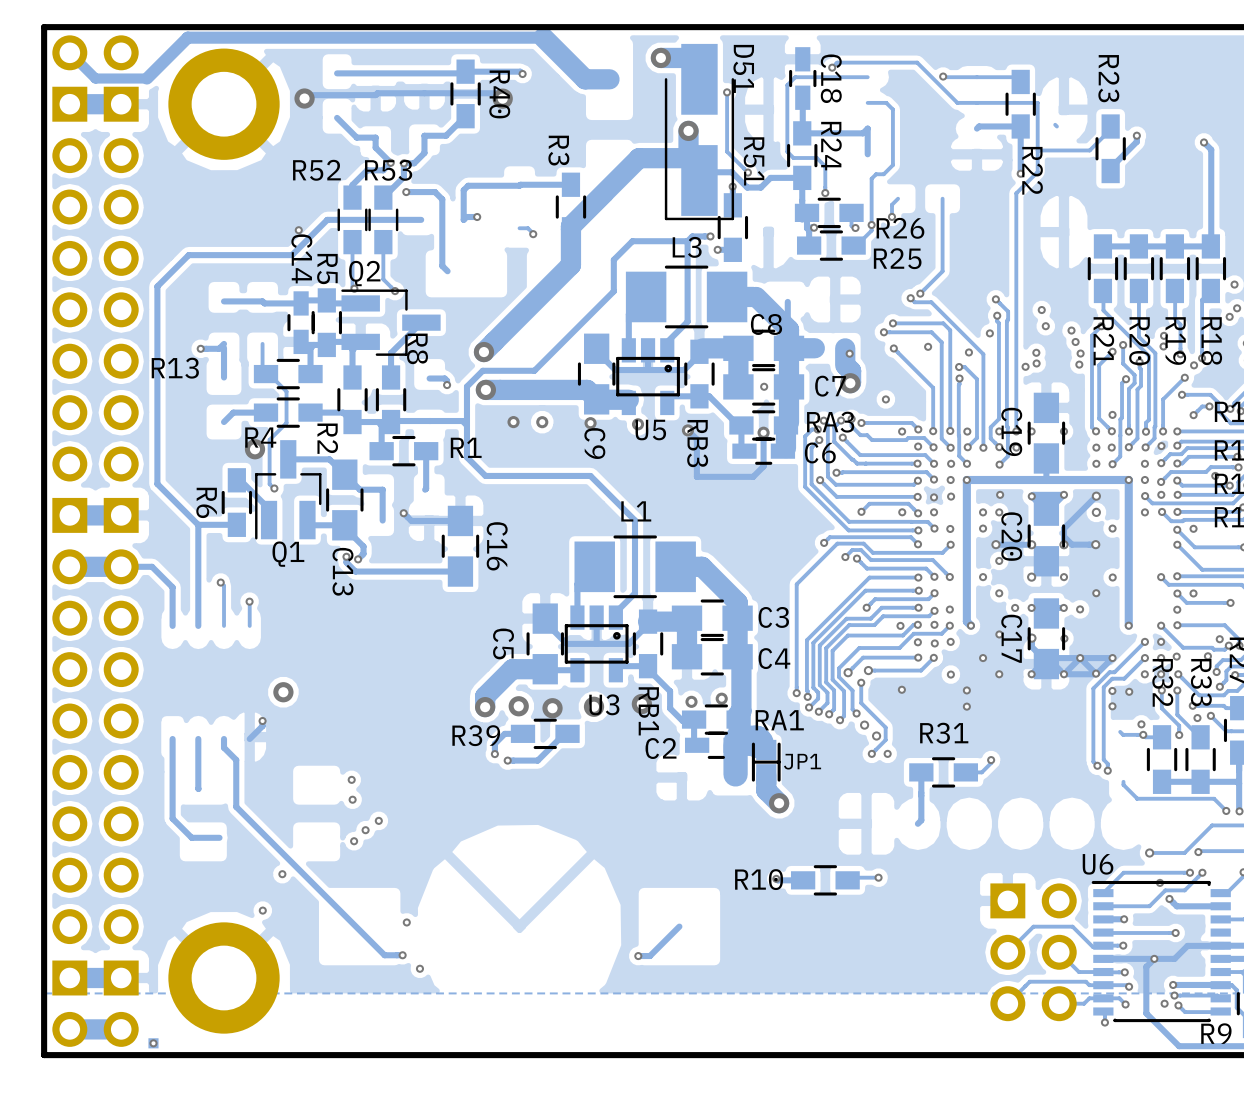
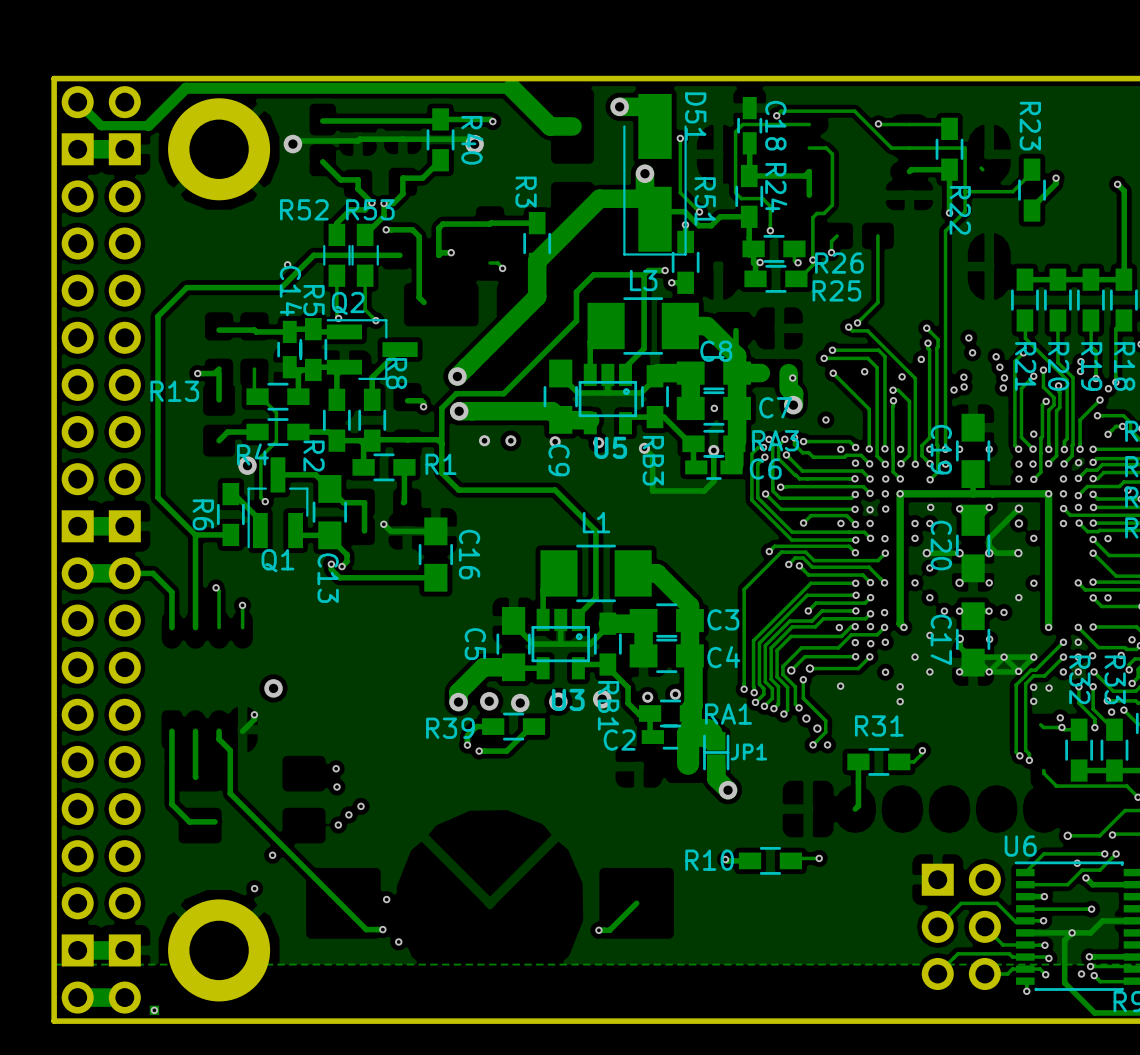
via: (1177, 609) -> none

